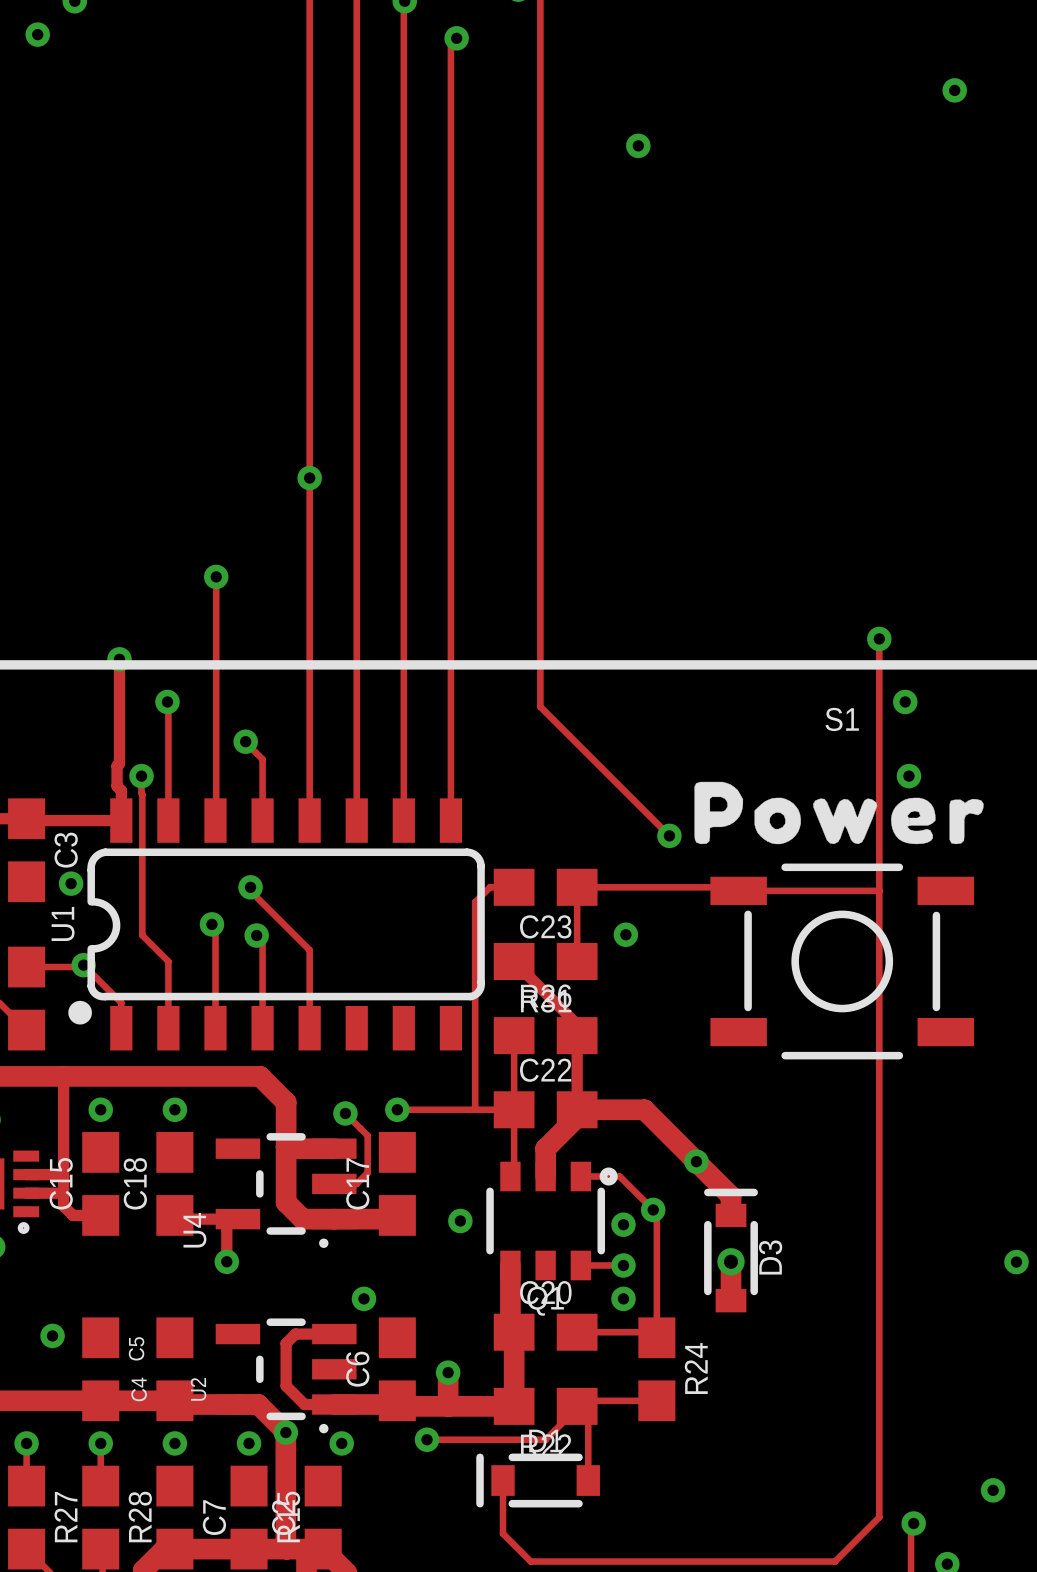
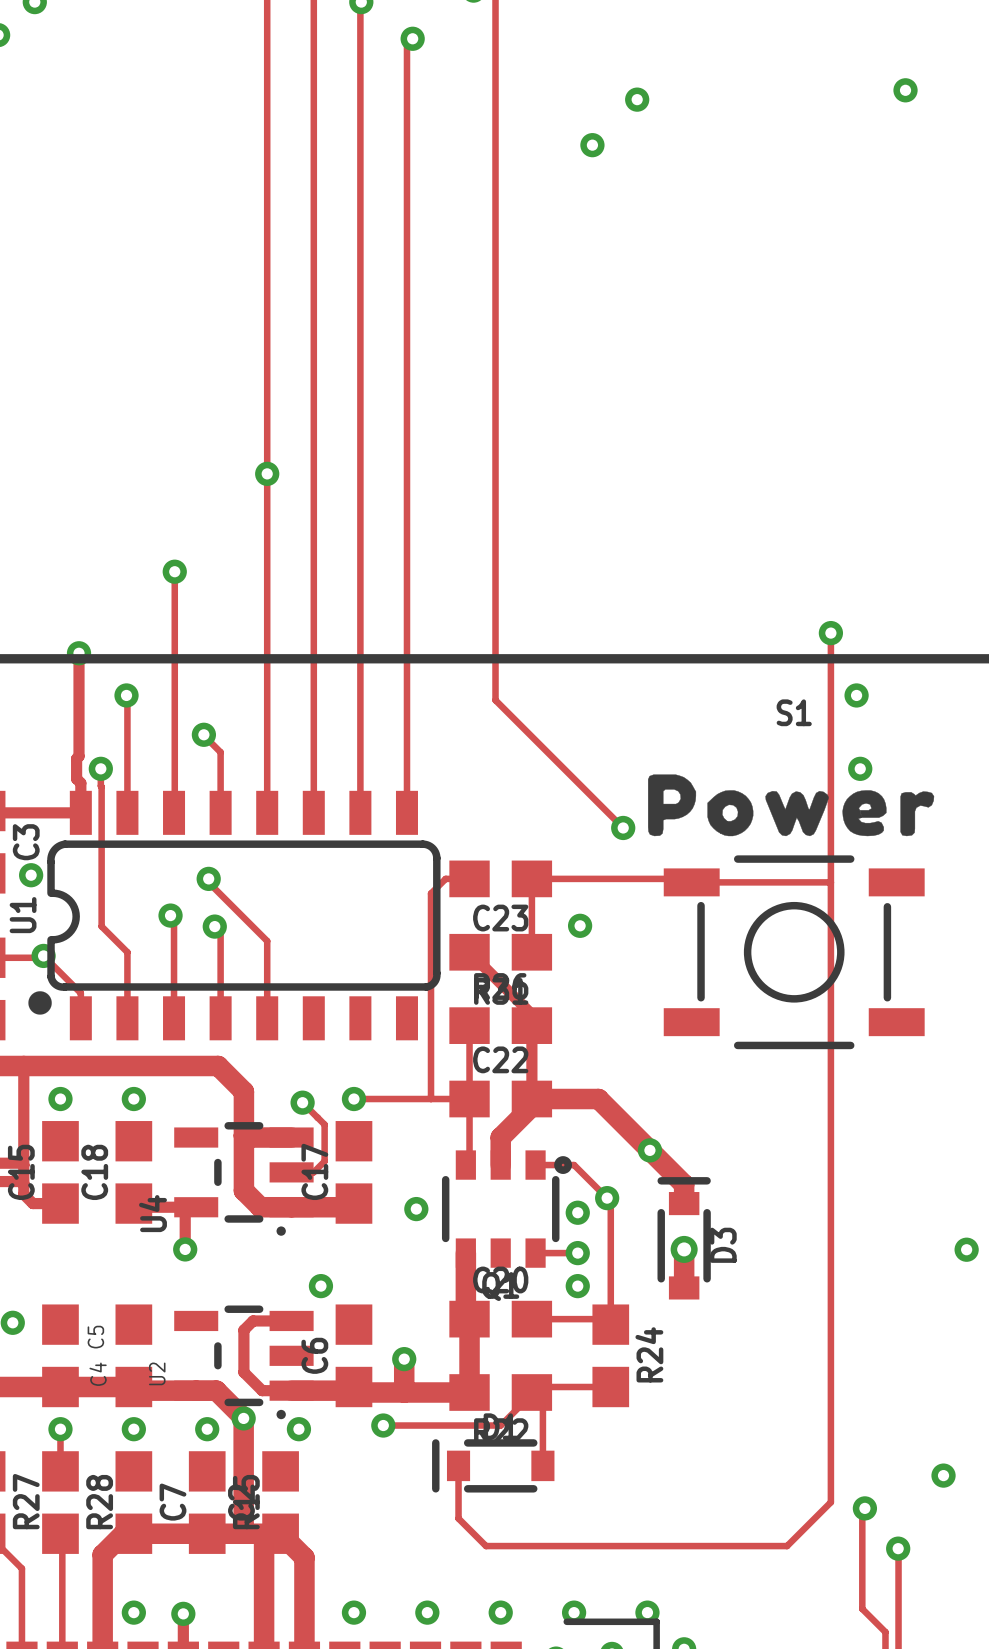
via: none -> (637, 99)

